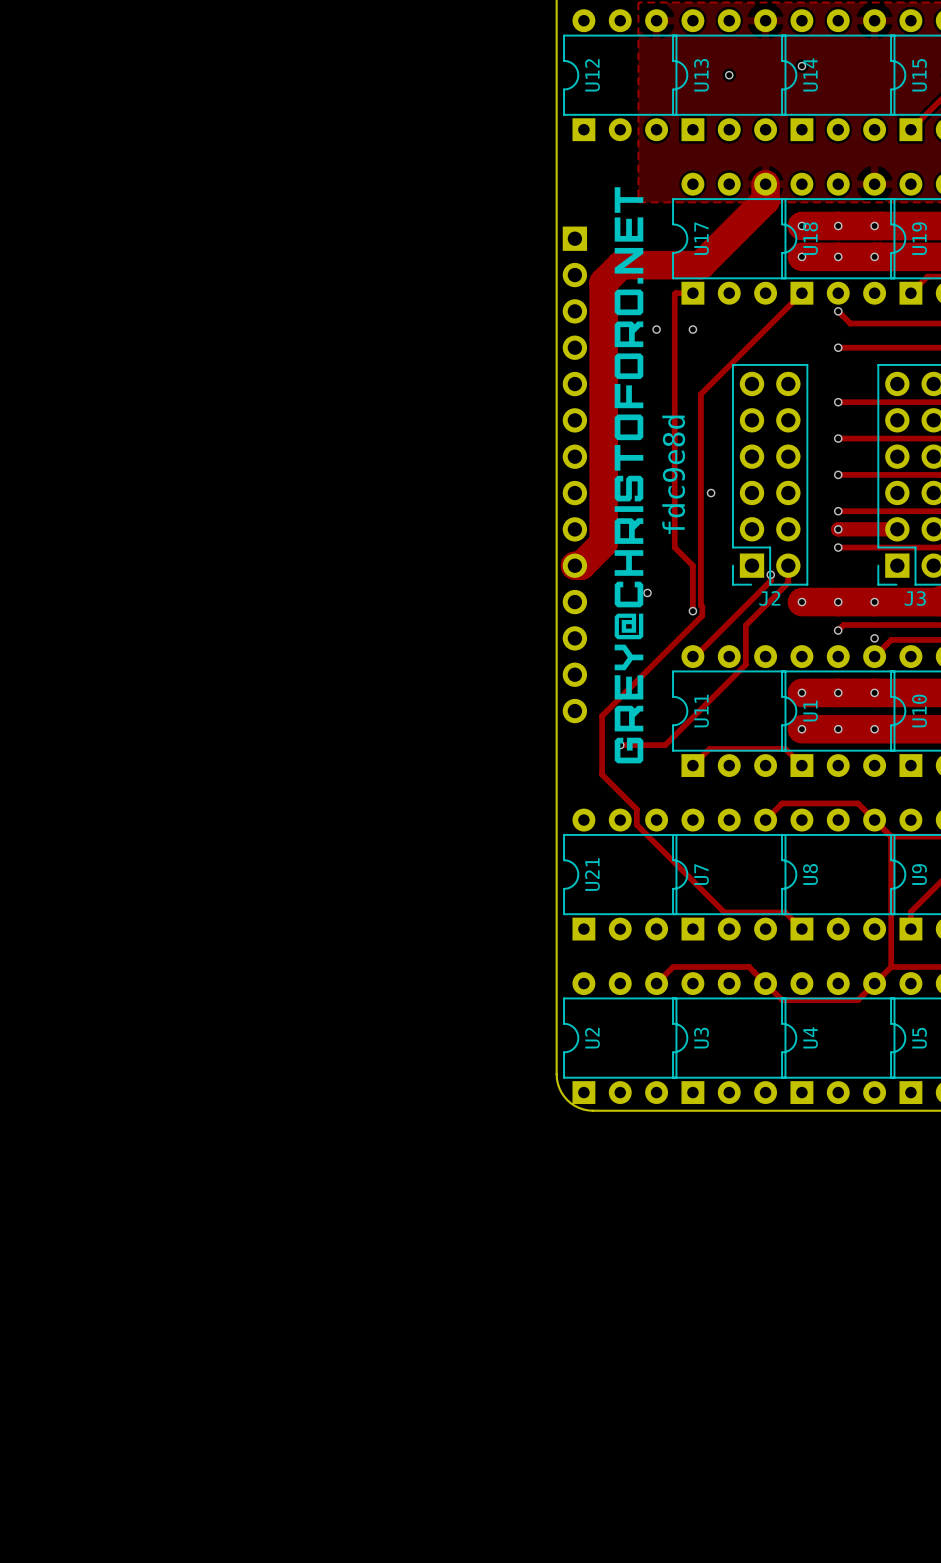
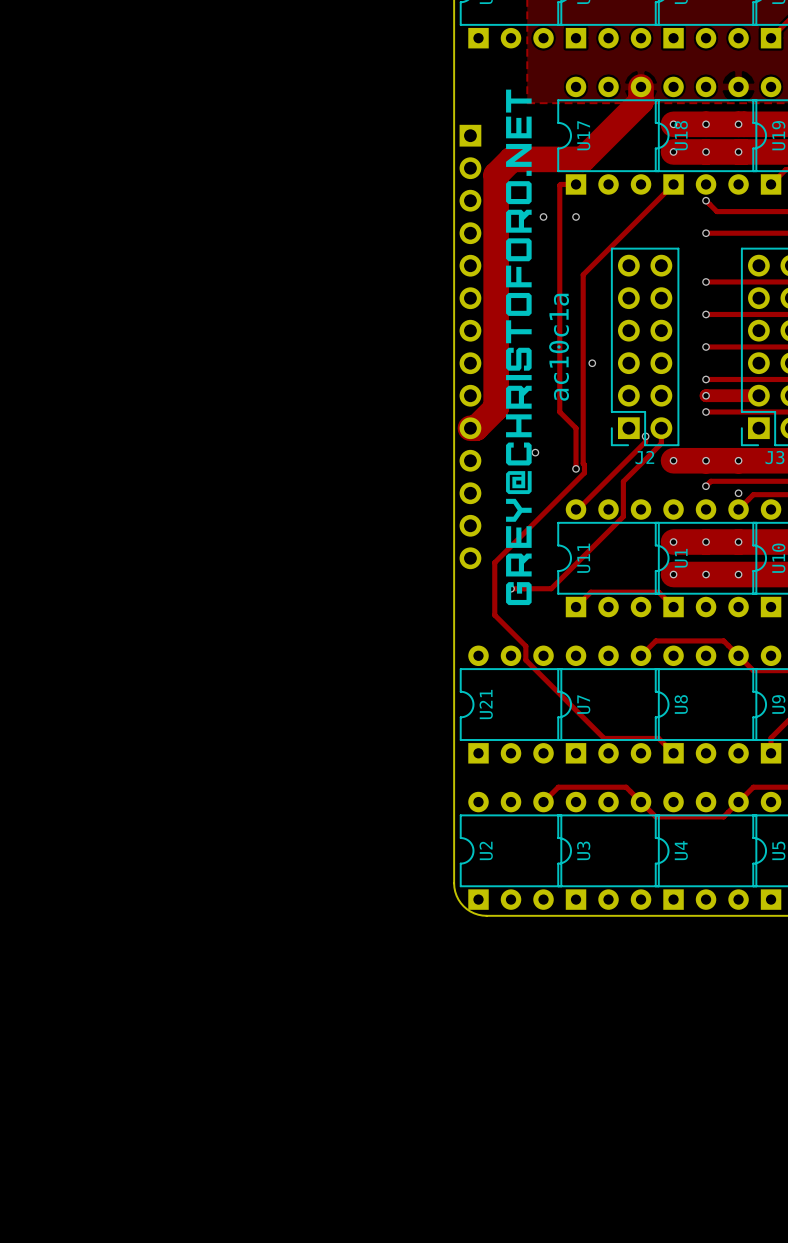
text: fdc9e8d (673, 474) -> ac10c1a (559, 347)
track: (891, 836) (891, 966) -> none

